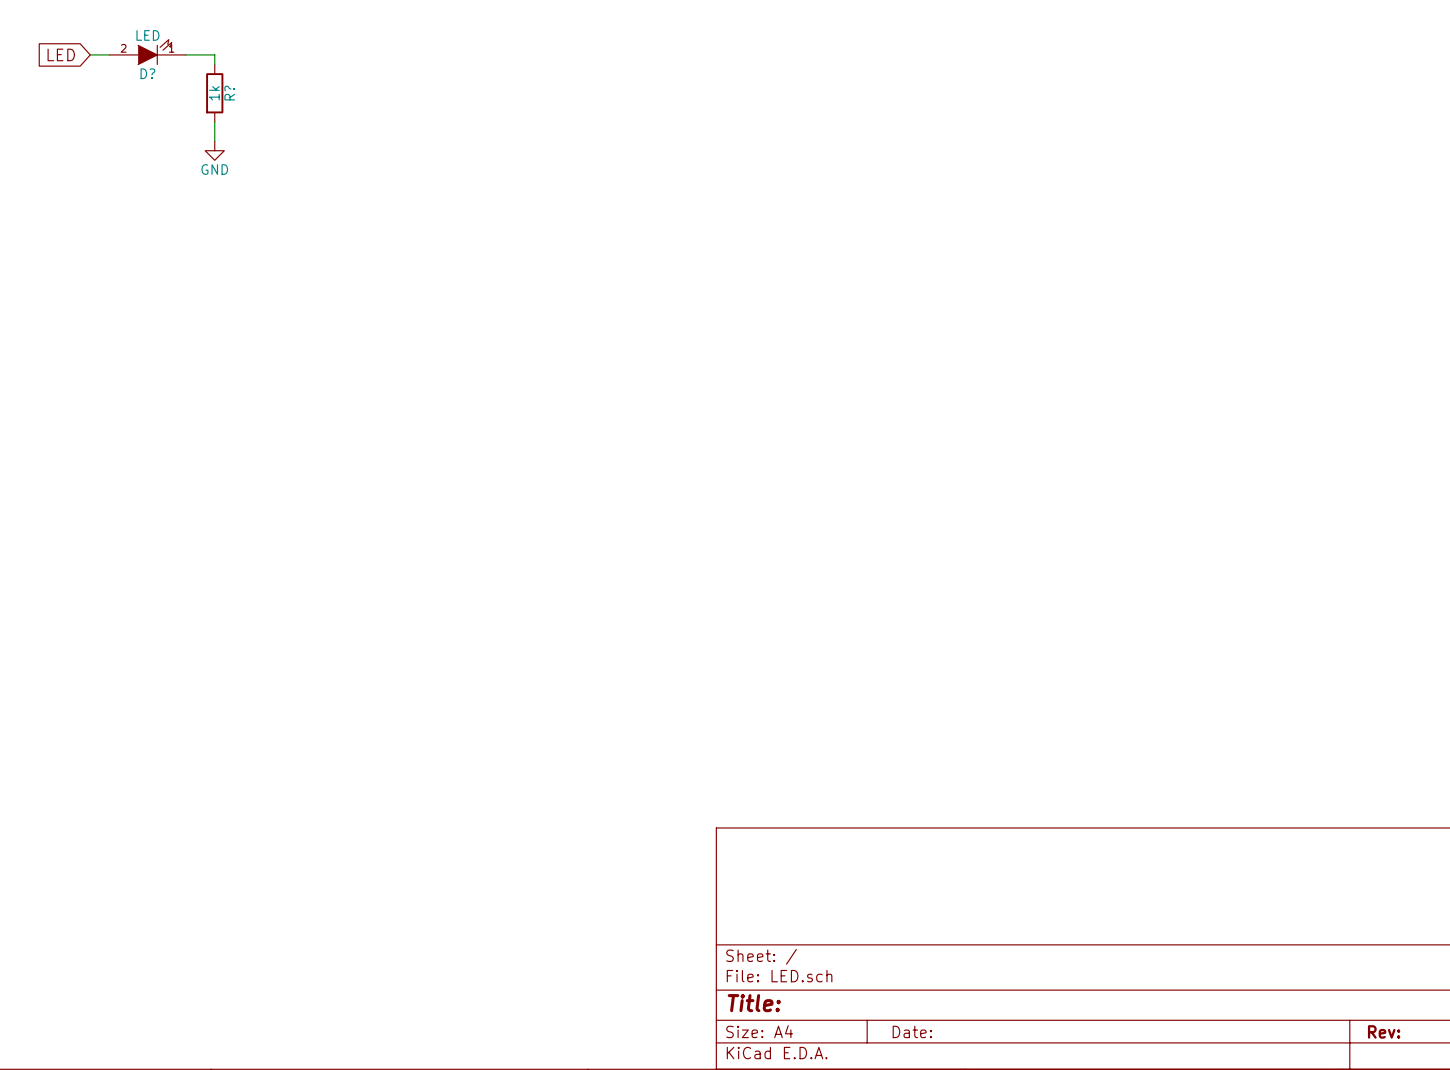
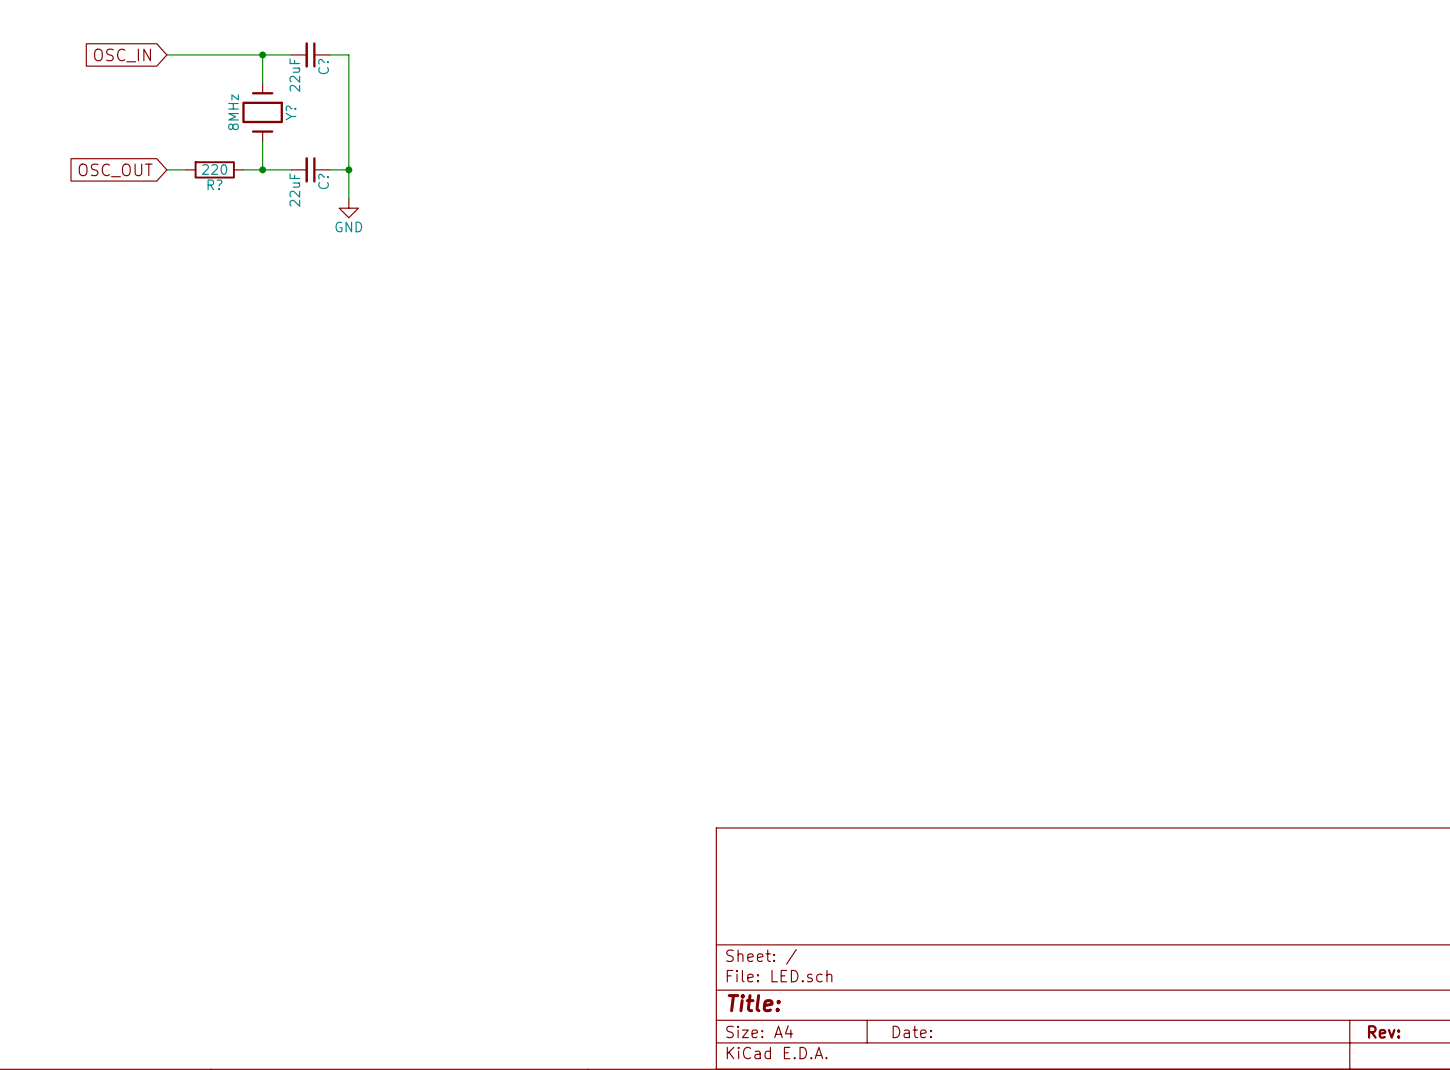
D?: LED (147, 52) -> none
global label: LED (61, 54) -> none
wire: (214, 54) (214, 64) -> (214, 54) (291, 54)
wire: none -> (262, 54) (262, 83)
junction: none -> (262, 54)
C?: none -> 22uF (310, 54)
wire: none -> (329, 54) (348, 54) (348, 198)
global label: none -> OSC_IN (122, 55)
R?: 1k (214, 93) -> none
Y?: none -> 8MHz (262, 112)
wire: (214, 121) (214, 141) -> none
wire: none -> (262, 141) (262, 169)
power symbol position: GND (214, 150) -> GND (348, 208)
wire: none -> (166, 169) (186, 169)
R?: none -> 220 (214, 169)
wire: none -> (243, 169) (291, 169)
junction: none -> (262, 169)
C?: none -> 22uF (310, 169)
wire: none -> (329, 169) (348, 169)
junction: none -> (348, 169)
global label: none -> OSC_OUT (115, 170)

